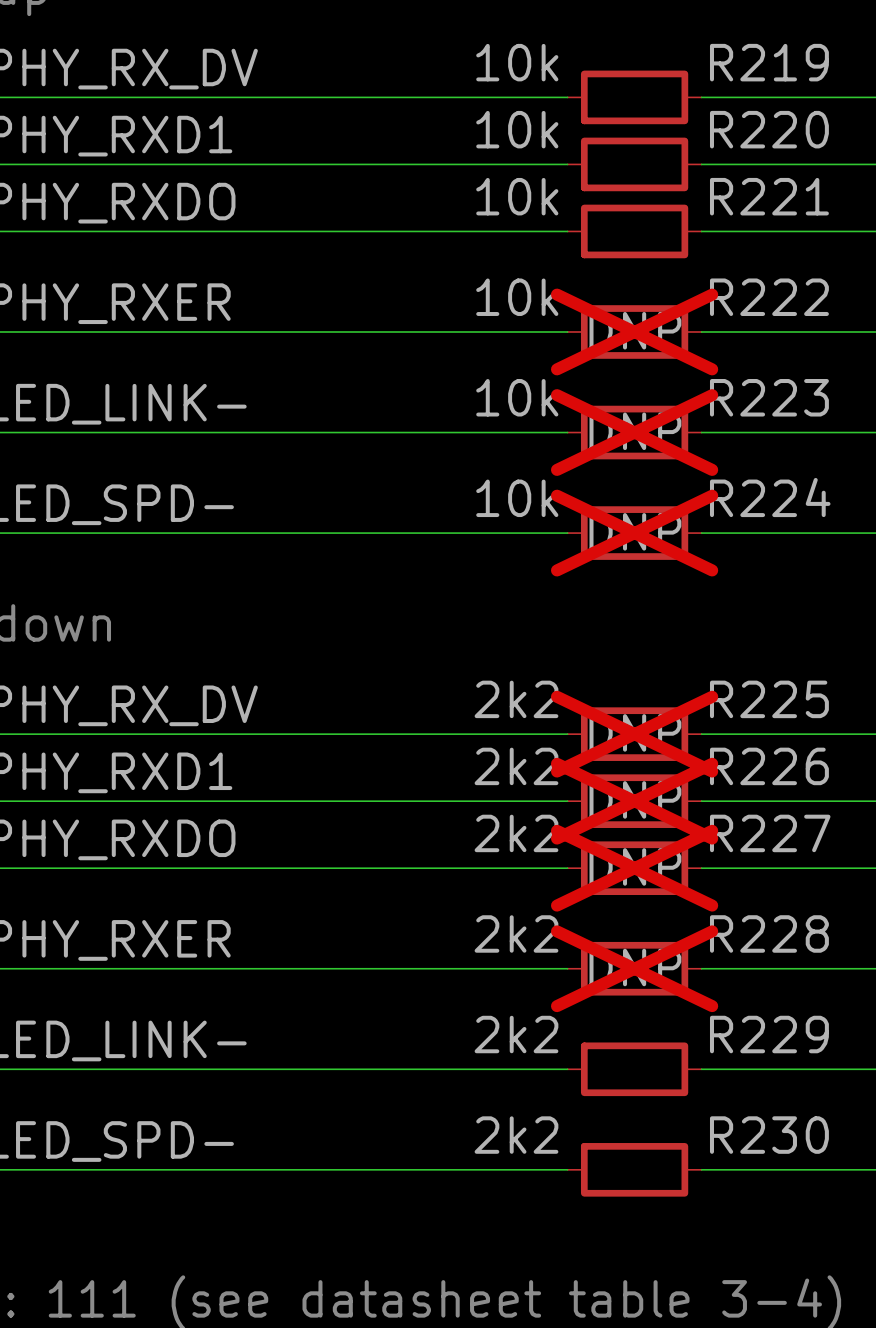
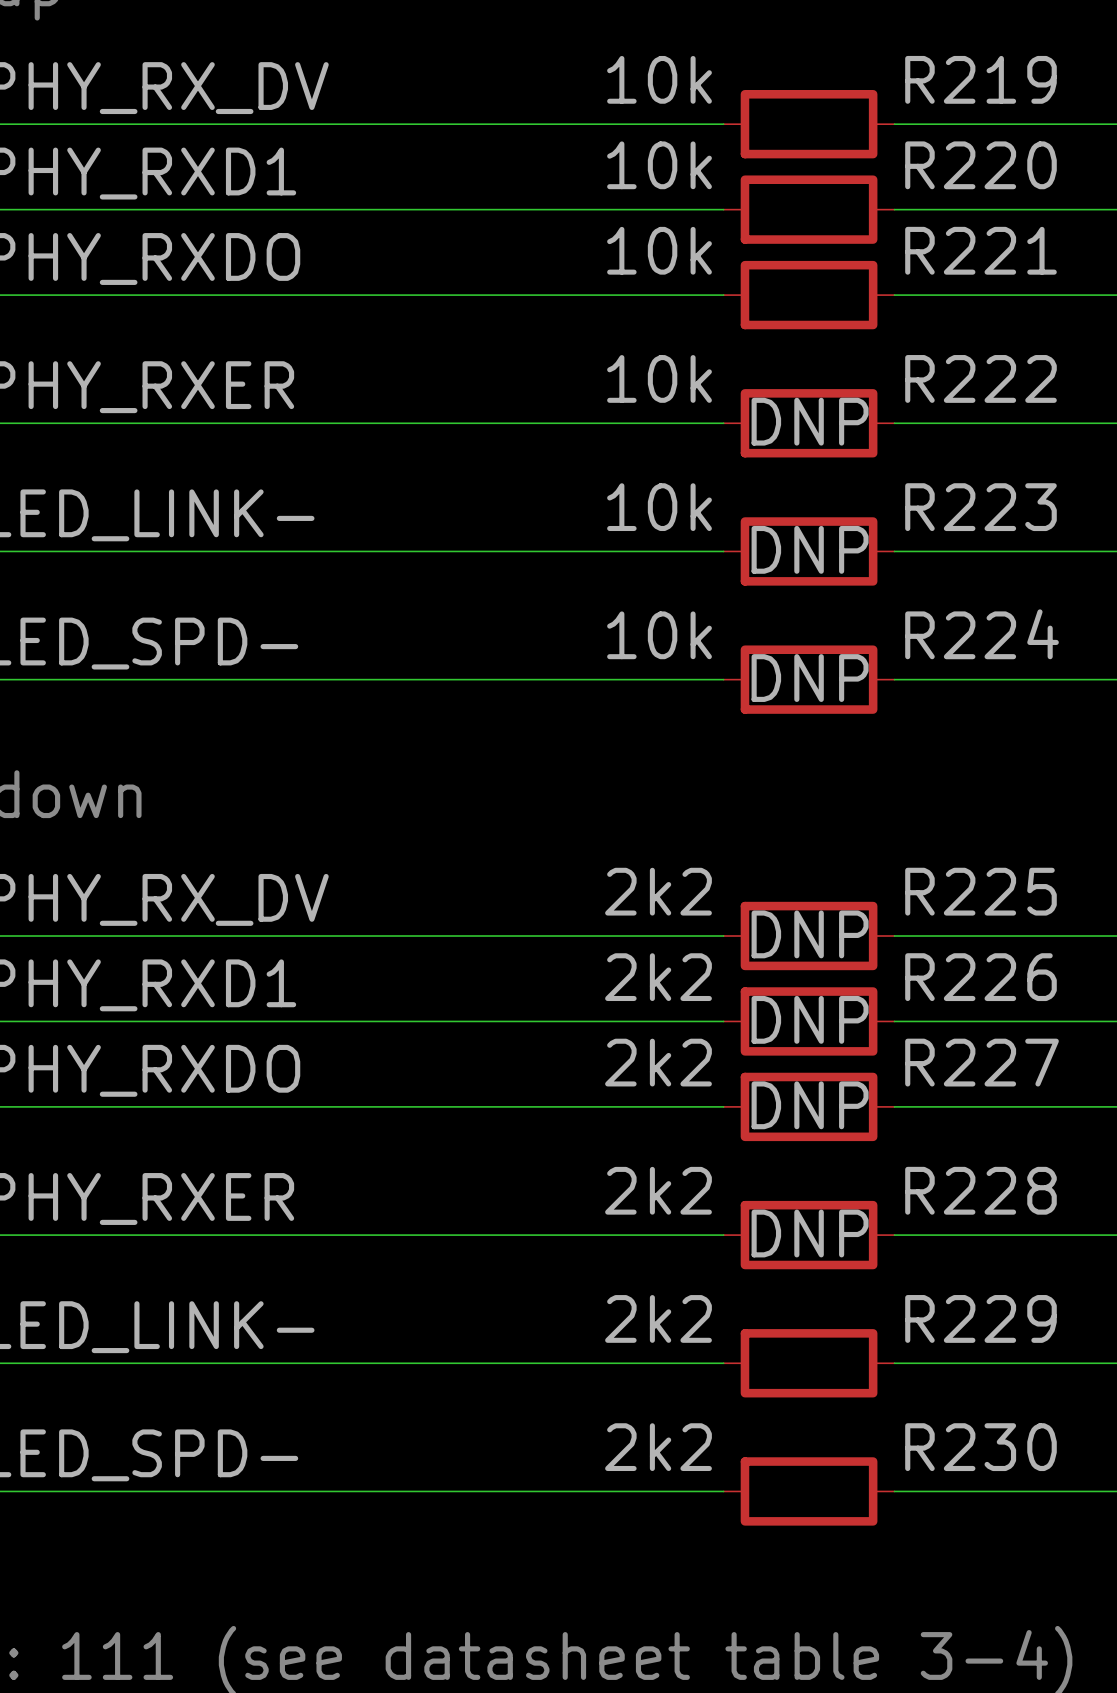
R222 do-not-place cross: (634, 331) -> none
R223 do-not-place cross: (634, 432) -> none
R224 do-not-place cross: (634, 533) -> none
R225 do-not-place cross: (634, 734) -> none
R226 do-not-place cross: (634, 801) -> none
R227 do-not-place cross: (634, 868) -> none
R228 do-not-place cross: (634, 968) -> none

